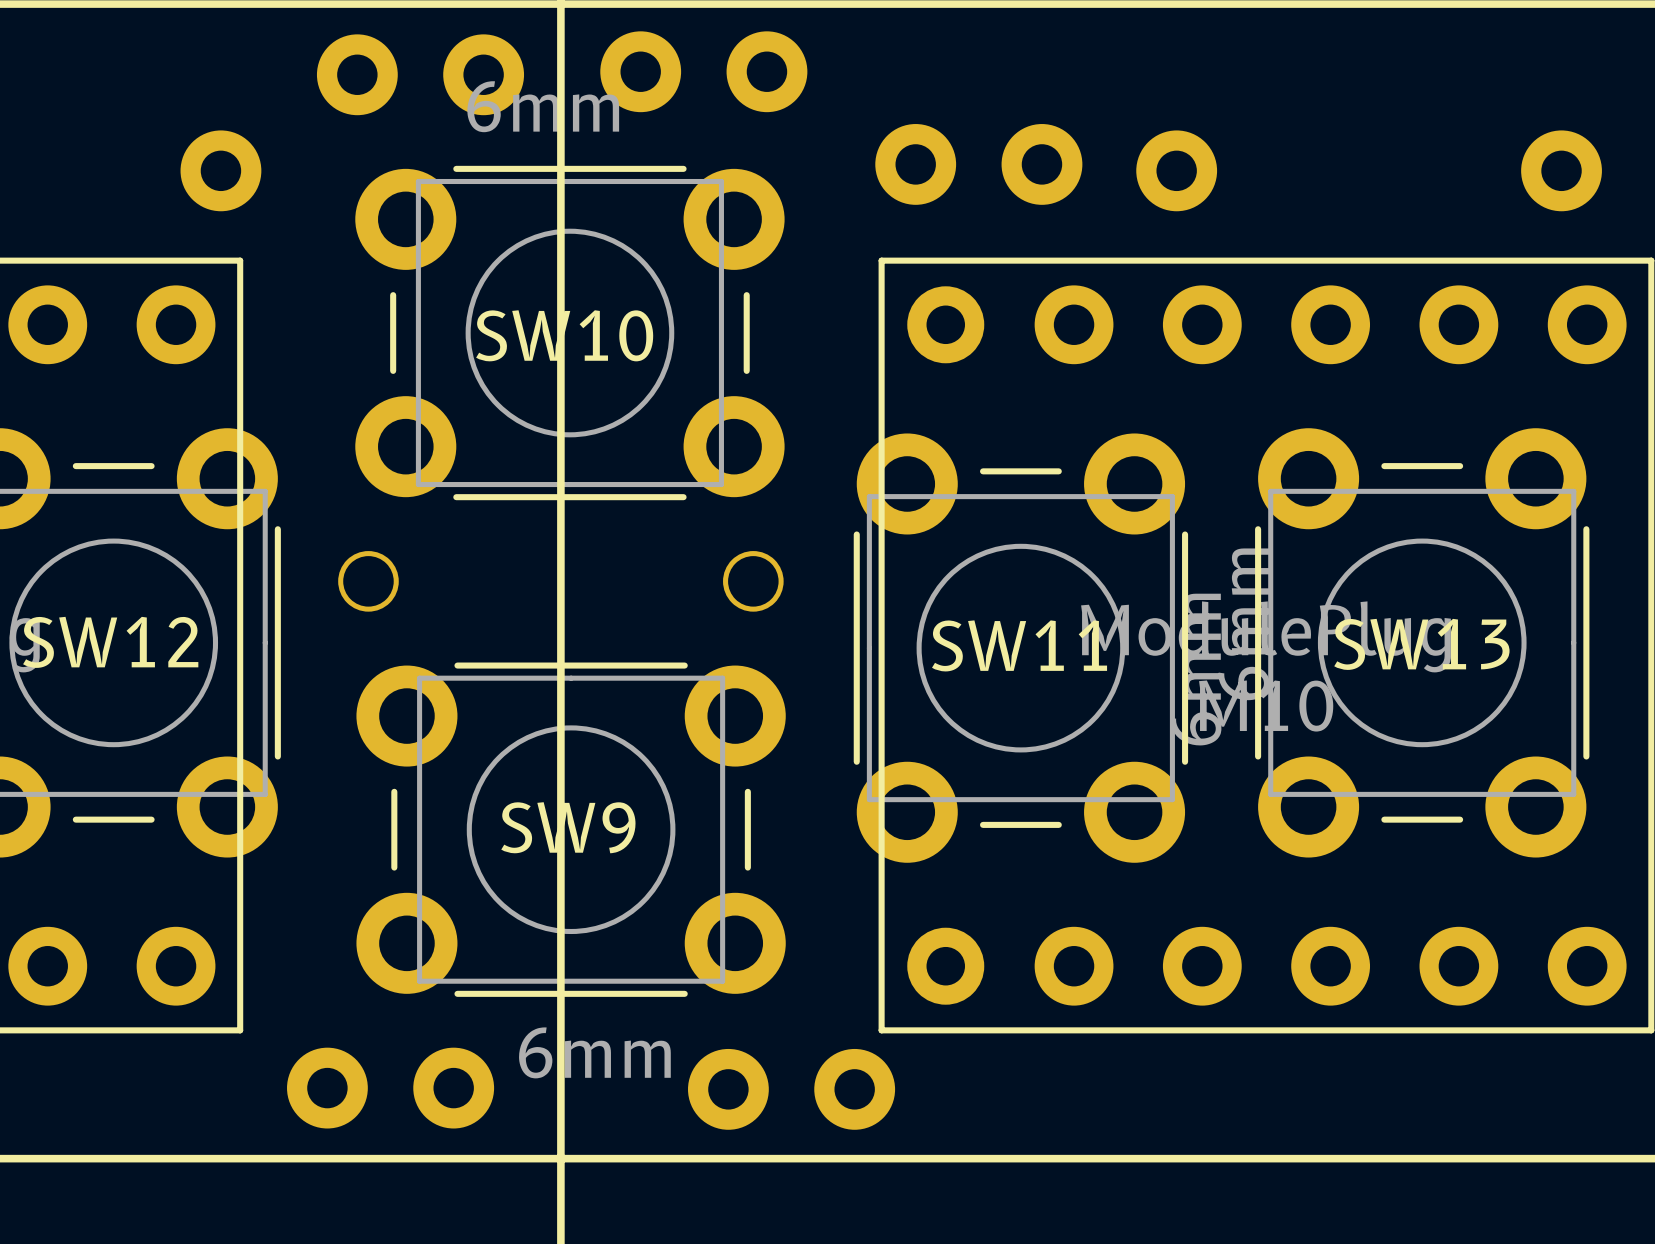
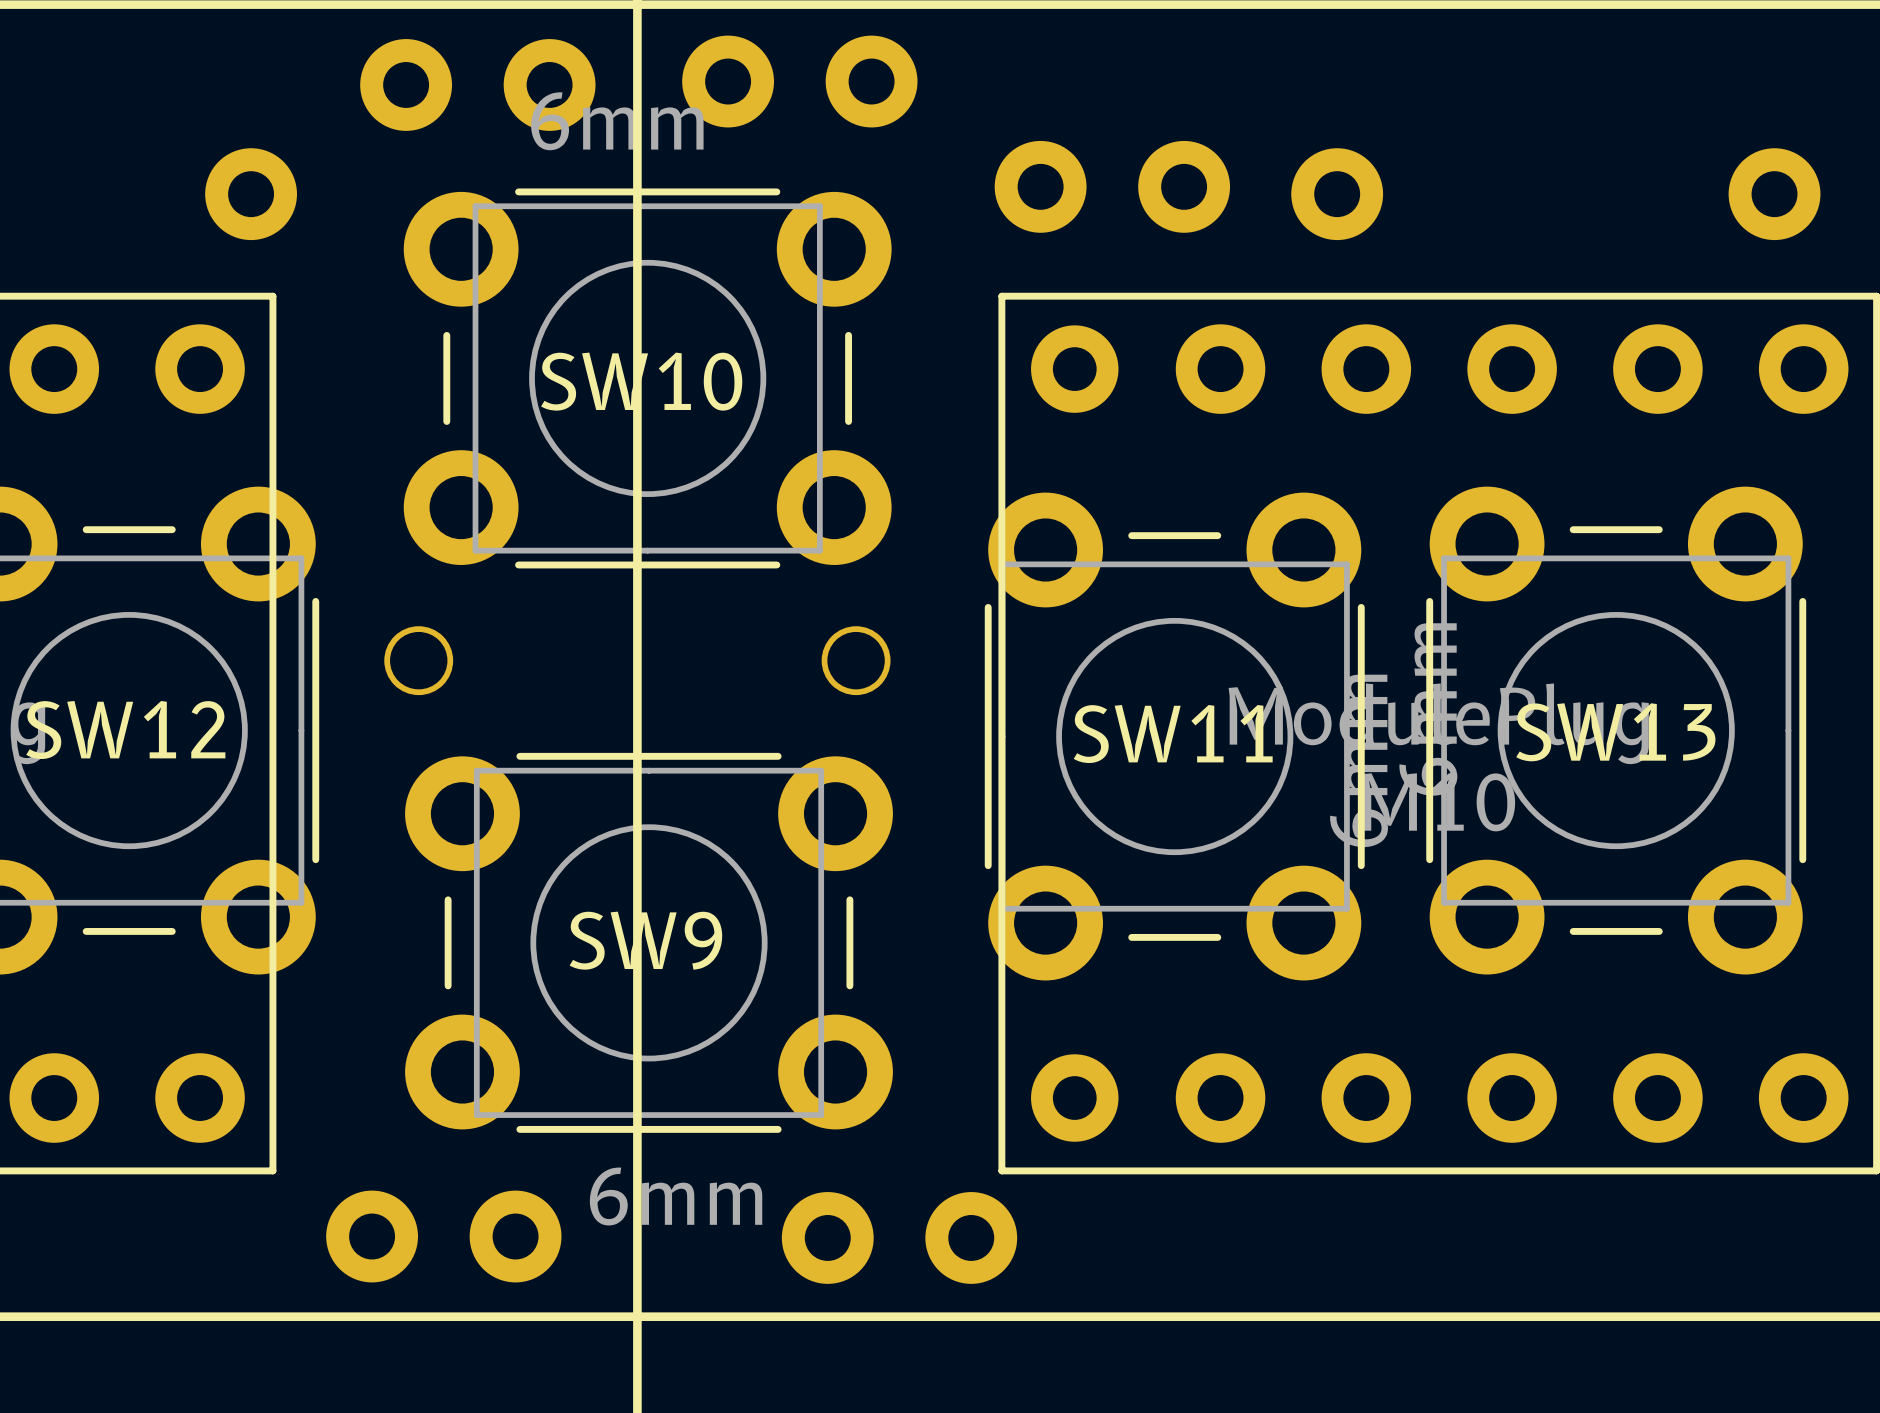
SW11 position: (1020, 648) -> (1174, 736)

